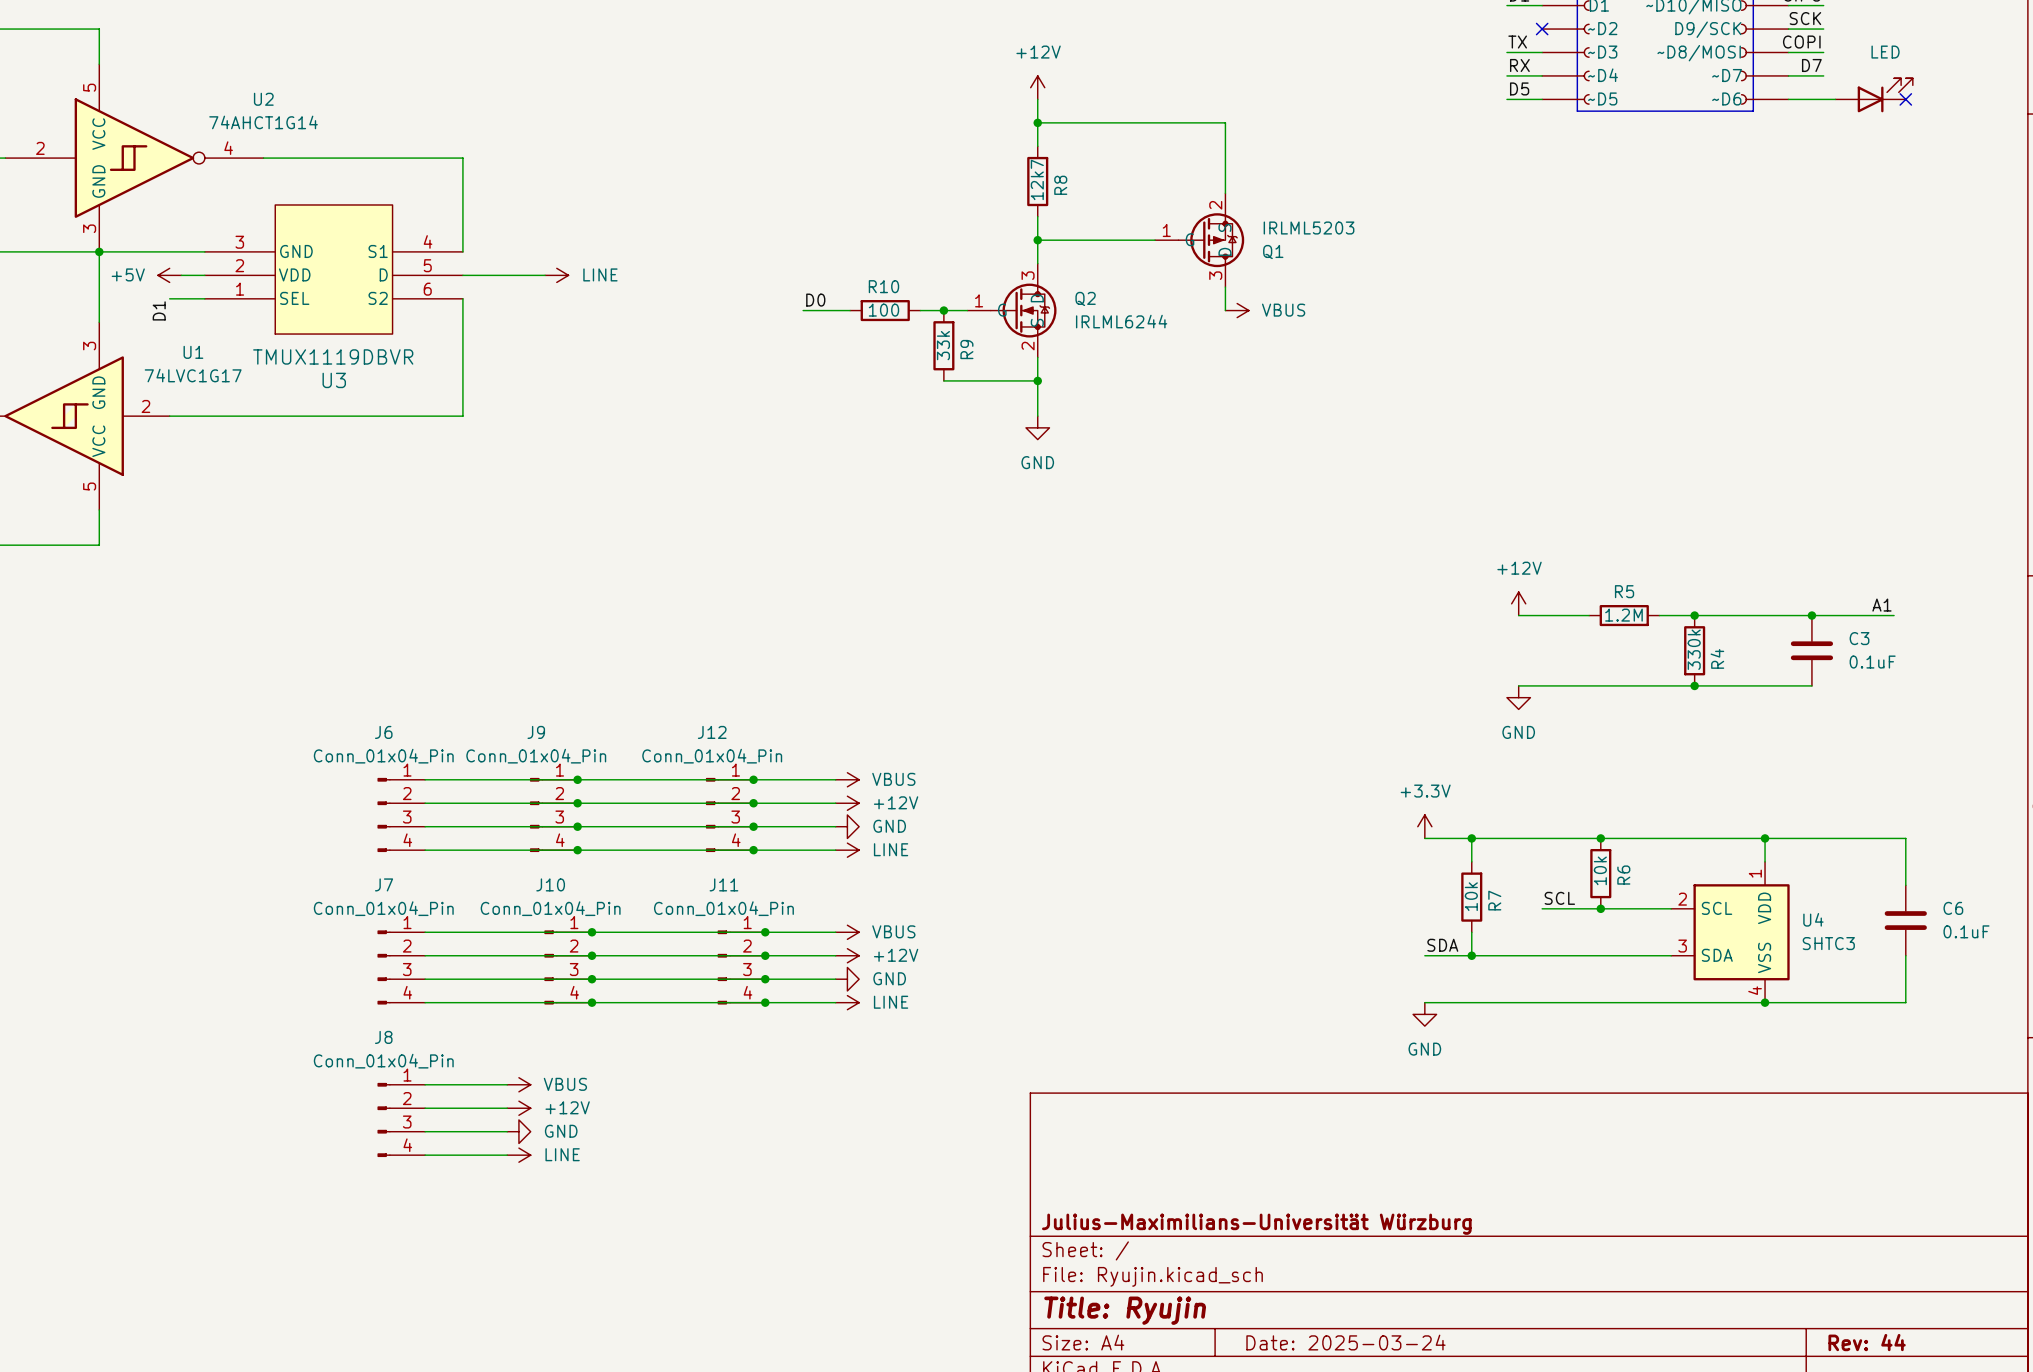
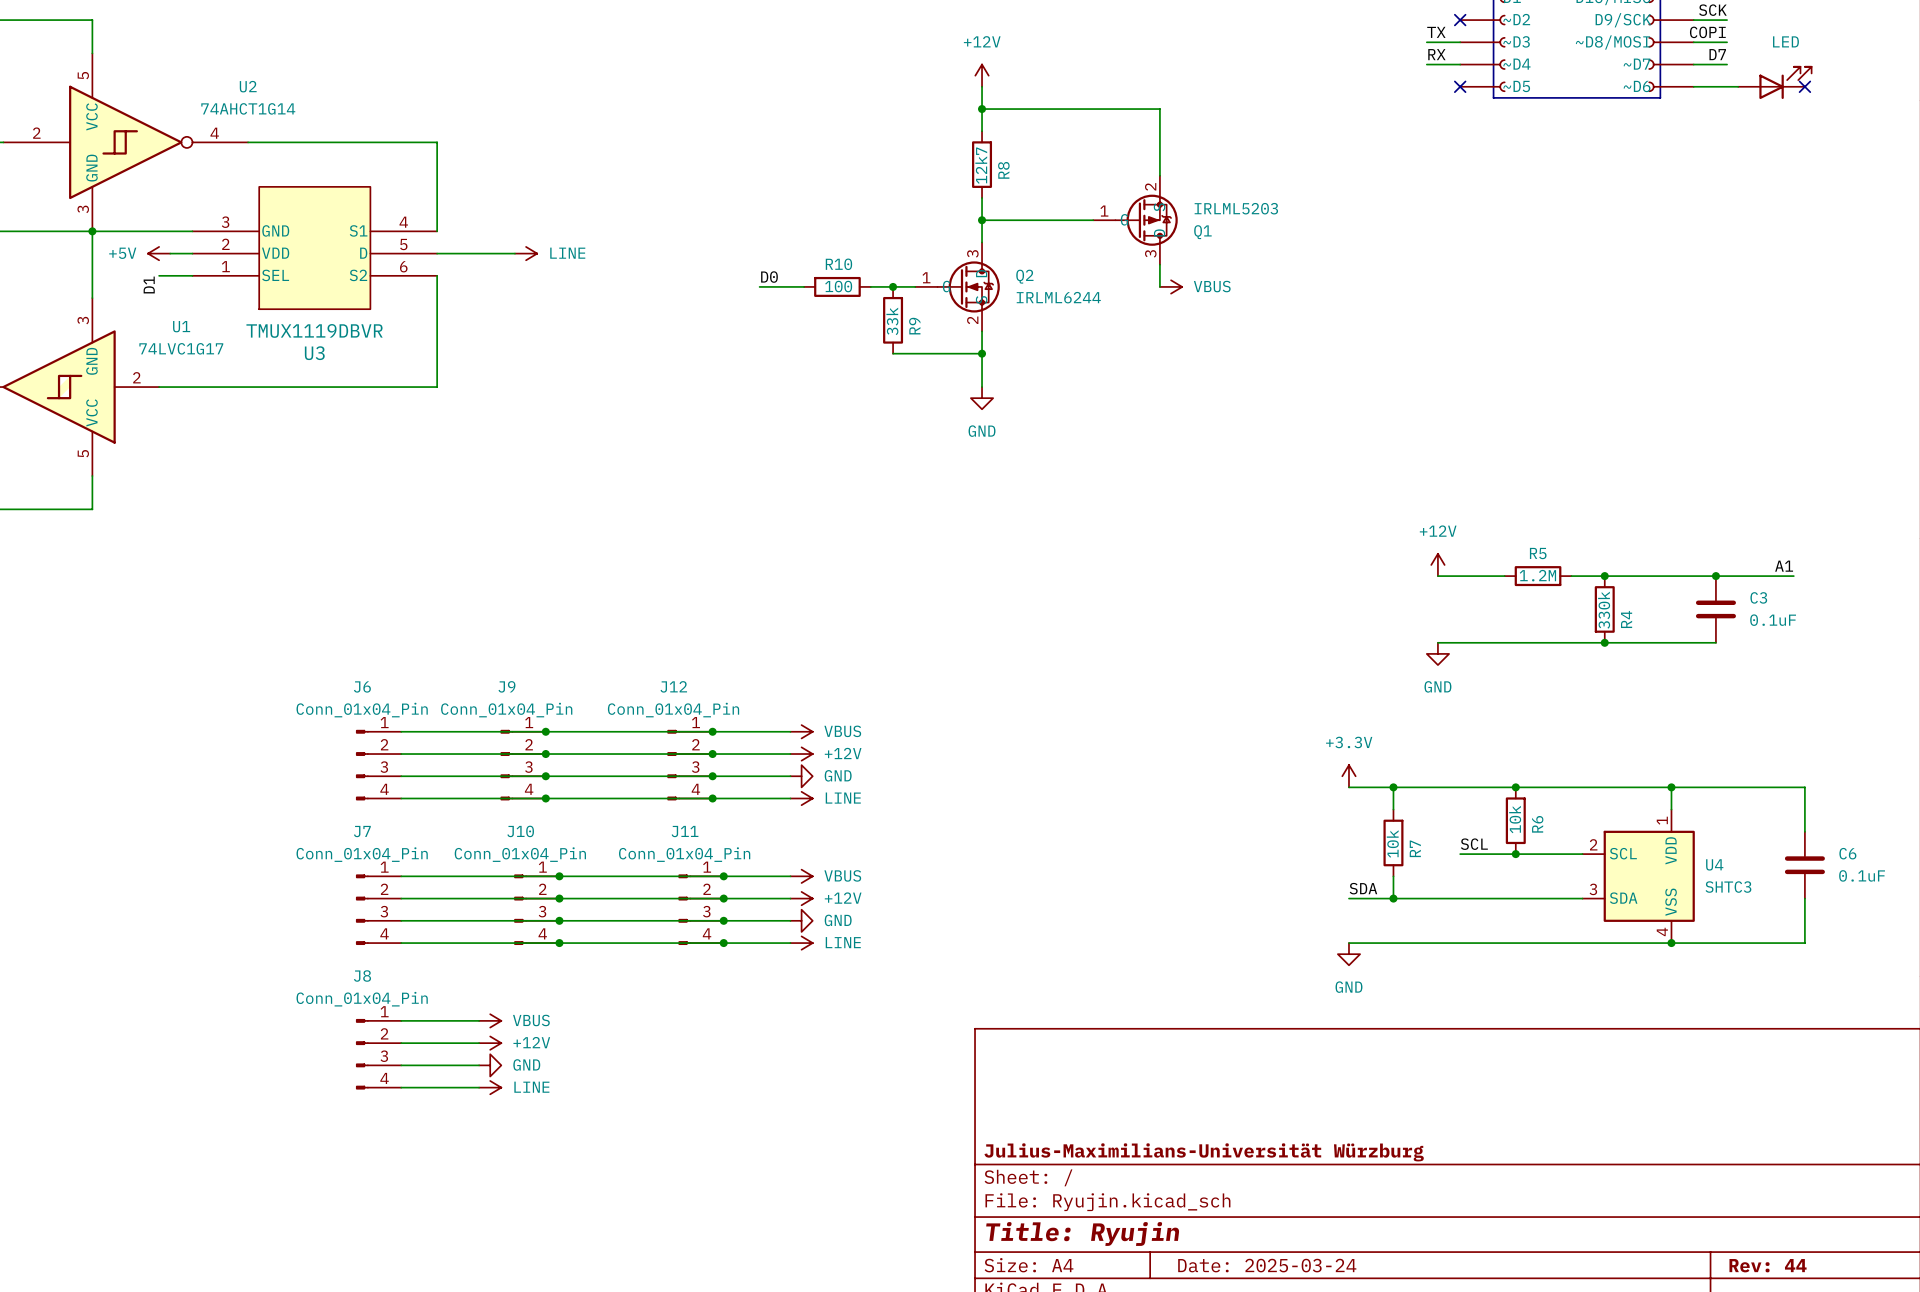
label: D5 (1519, 88) -> none
wire: (1506, 99) (1542, 99) -> none
no-connect mark: none -> (1460, 86)

